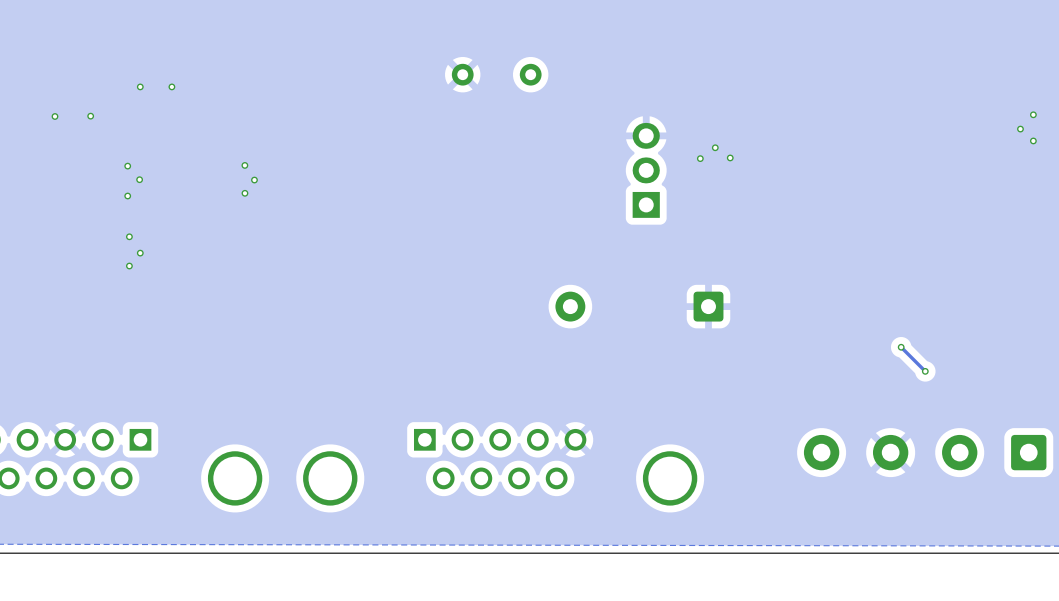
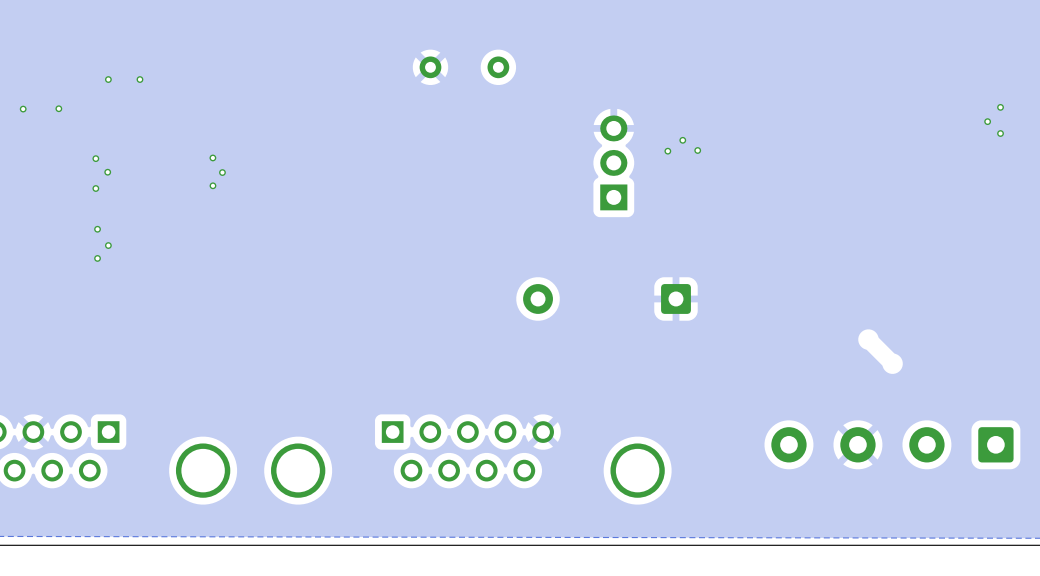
track: (901, 347) (925, 371) -> none
via: (901, 347) -> none
via: (925, 371) -> none

